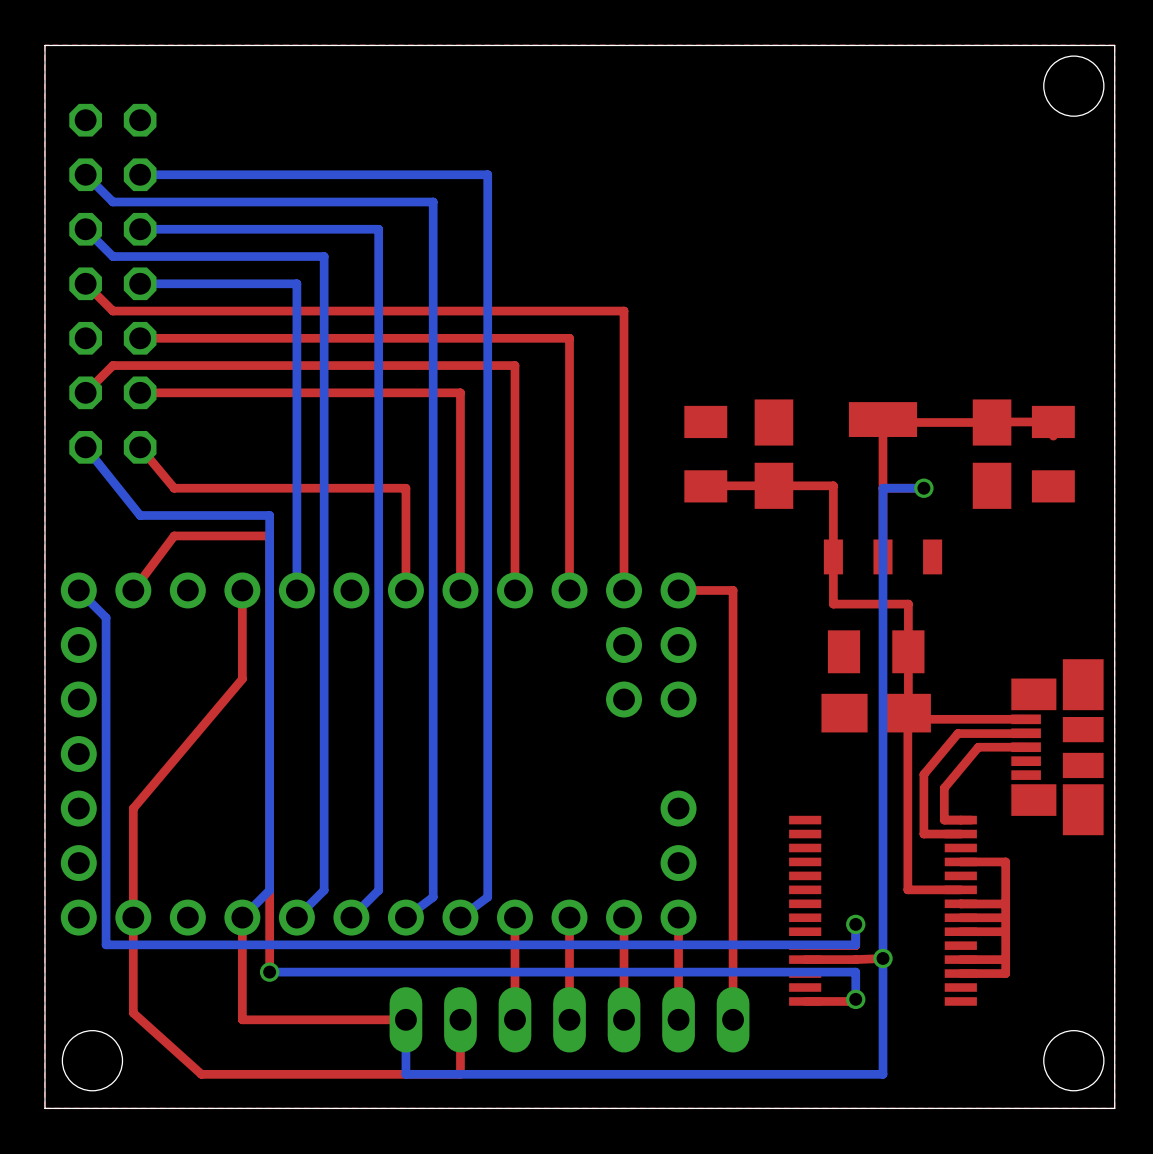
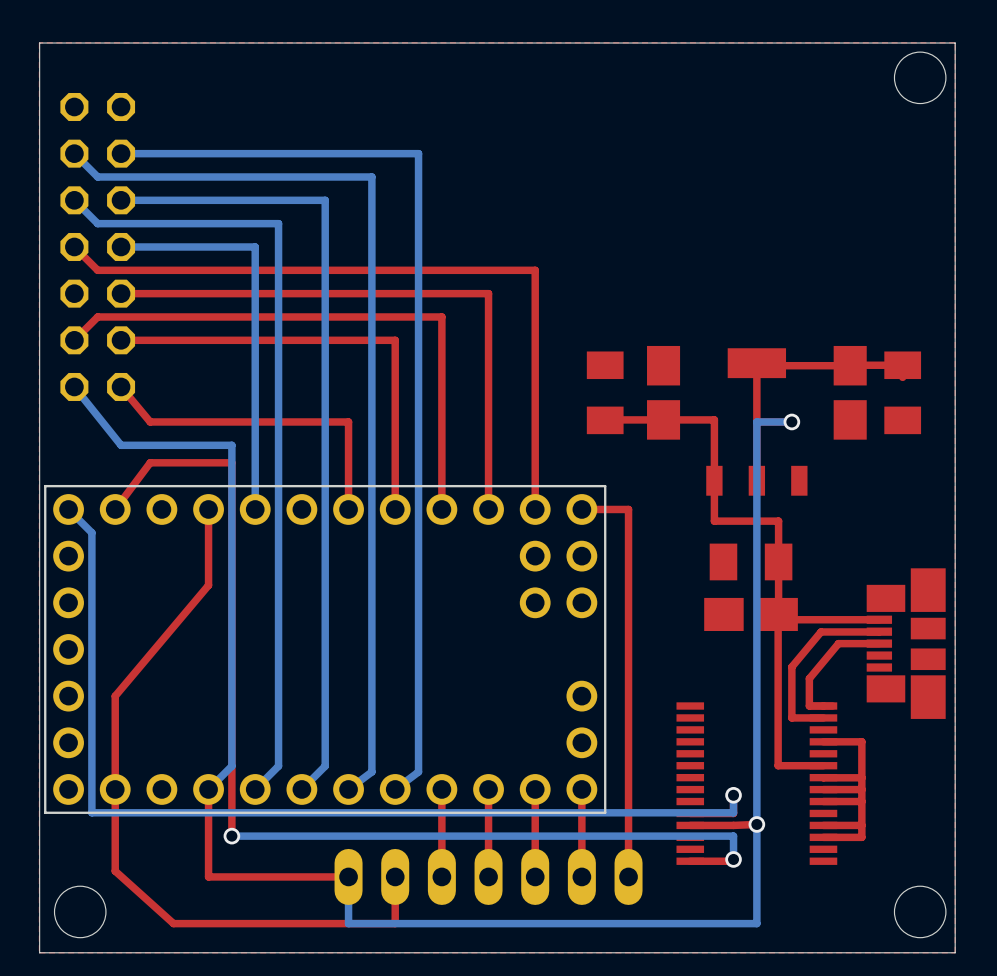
part footprint: [60, 572, 697, 936] -> [44, 484, 607, 814]

